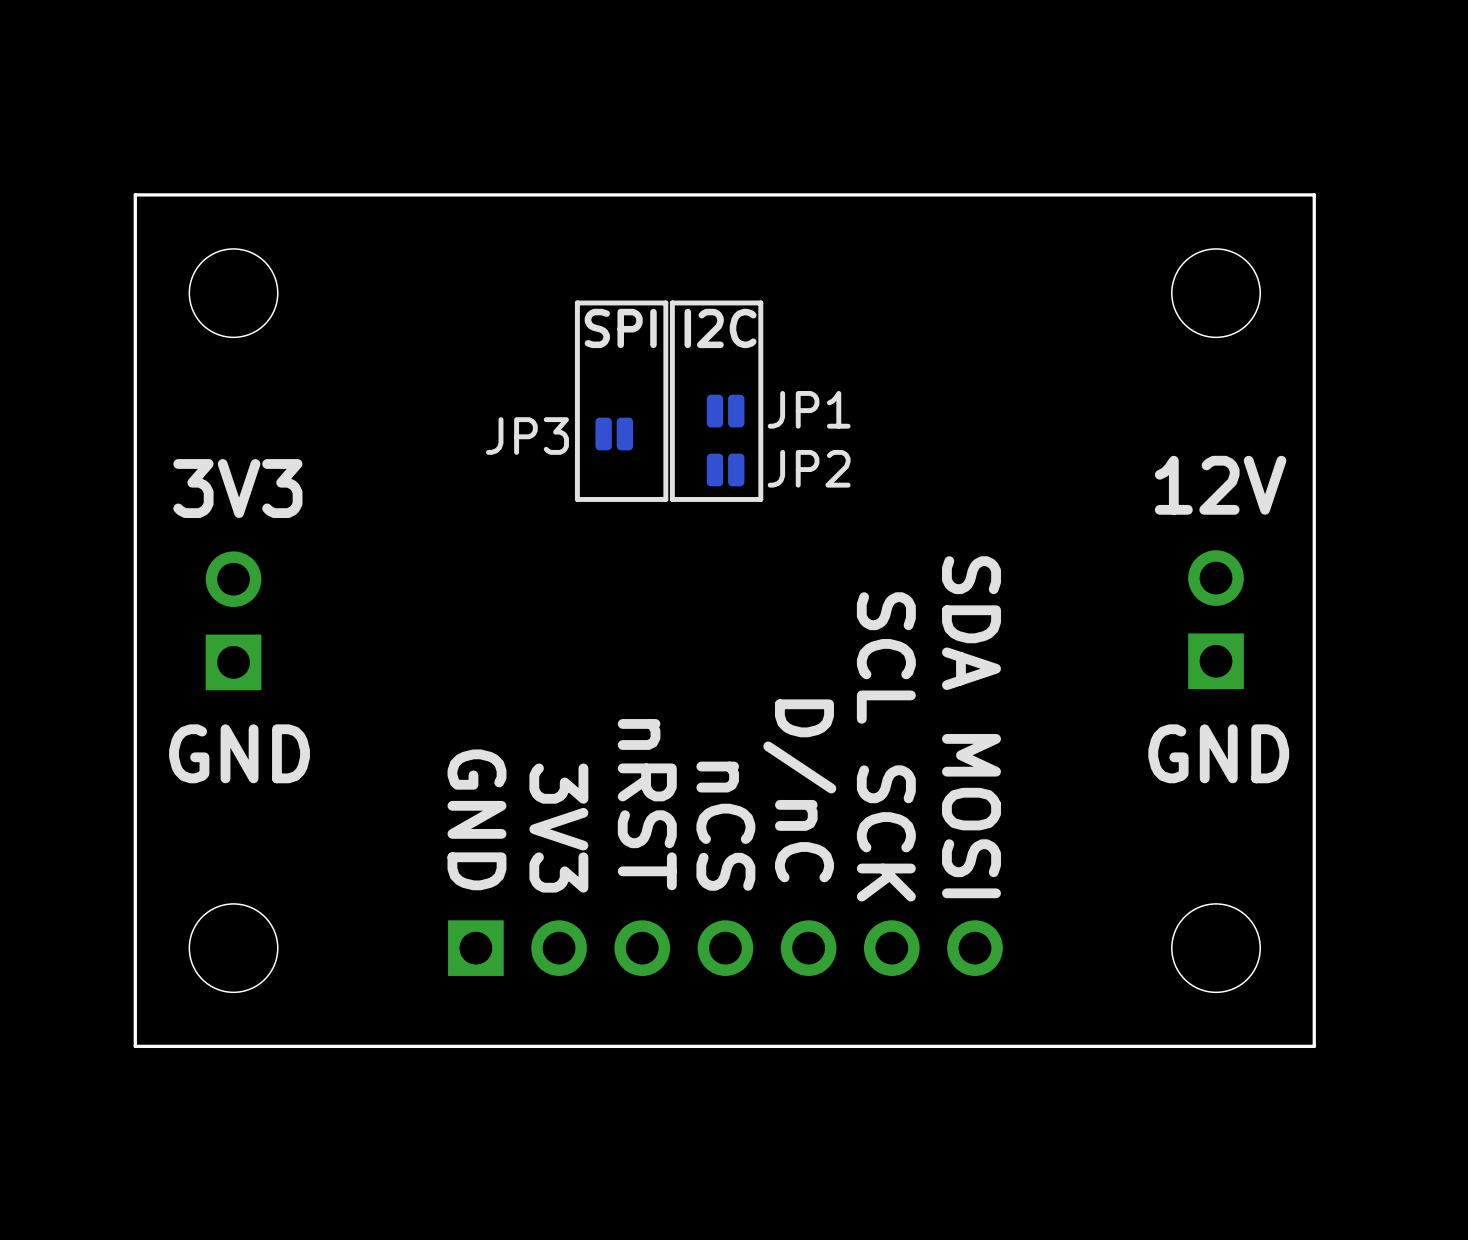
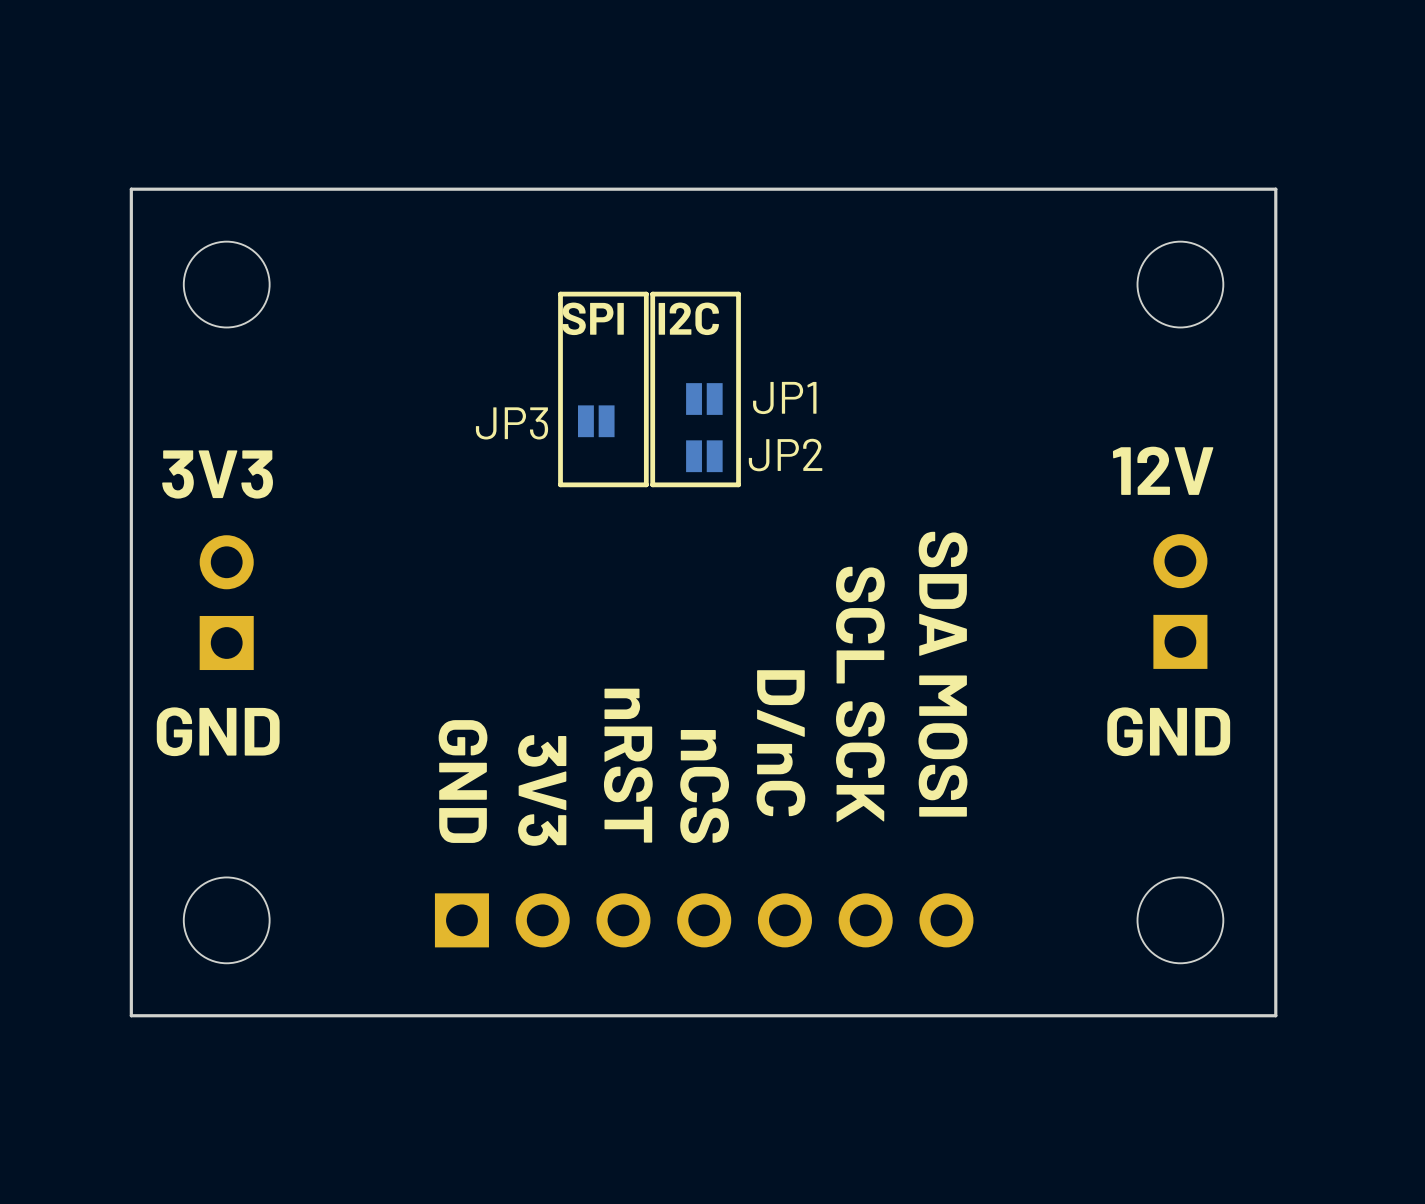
JP1 footprint: [706, 394, 745, 428] -> [686, 383, 723, 415]
JP3 footprint: [595, 417, 634, 451] -> [577, 405, 615, 438]
JP2 footprint: [706, 453, 745, 487] -> [686, 440, 723, 473]

